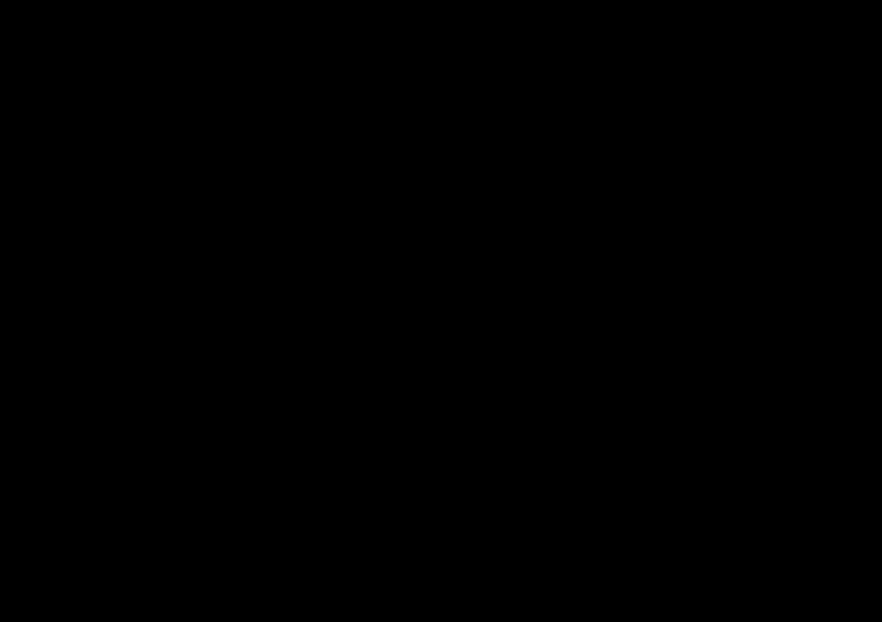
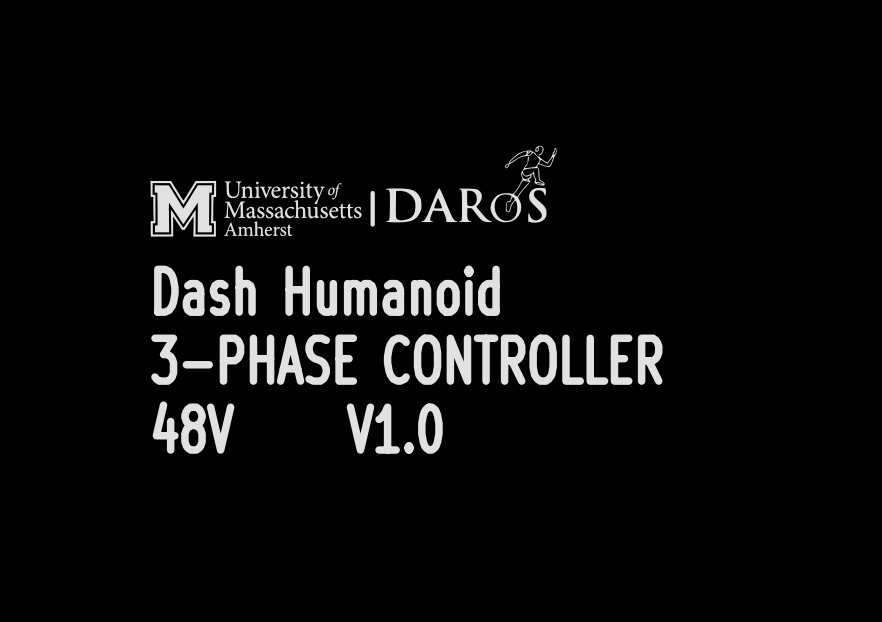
drawing: none -> [150, 145, 557, 237]
line: none -> (372, 193) (372, 224)
text: none -> Dash Humanoid (326, 290)
text: none -> 3-PHASE CONTROLLER (406, 359)
text: none -> 48V V1.0 (297, 427)

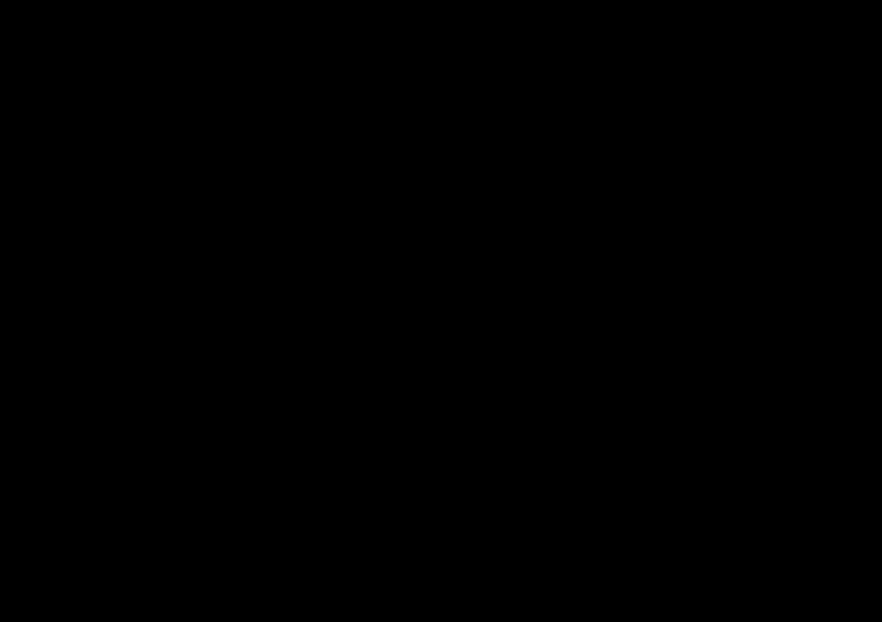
drawing: [150, 145, 557, 237] -> none
line: (372, 193) (372, 224) -> none
text: Dash Humanoid (326, 290) -> none
text: 3-PHASE CONTROLLER (406, 359) -> none
text: 48V V1.0 (297, 427) -> none

